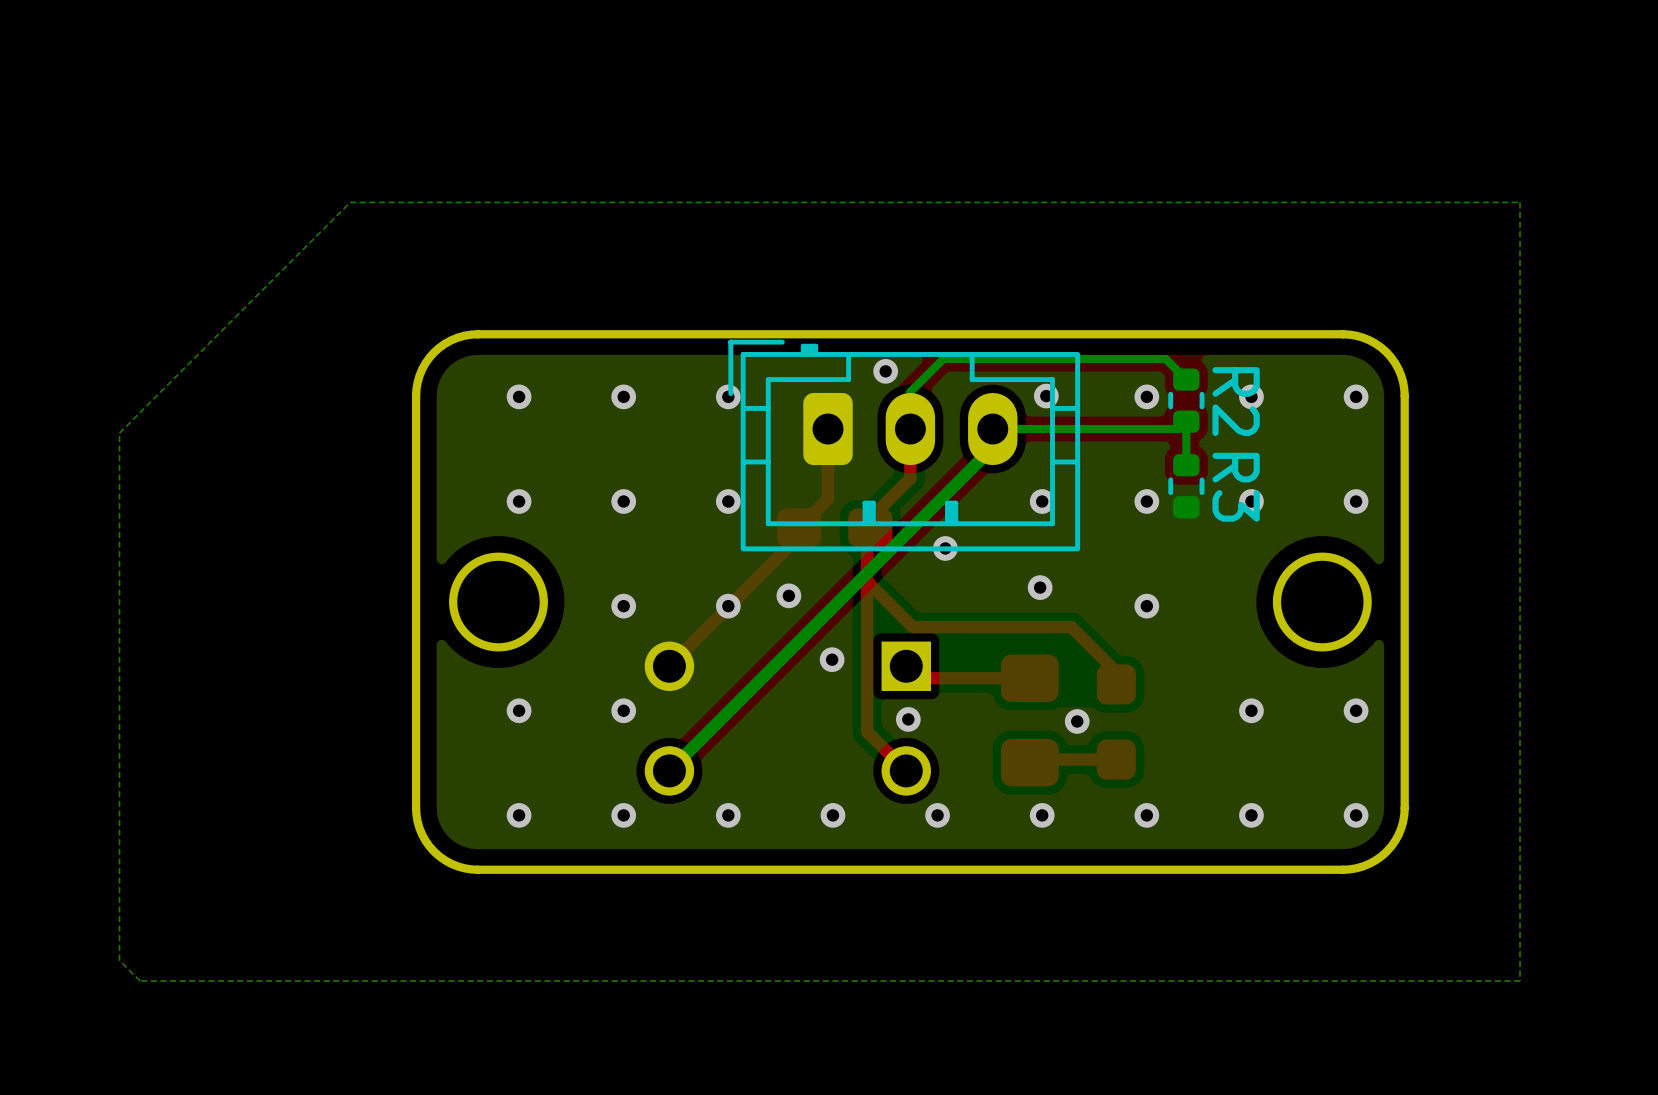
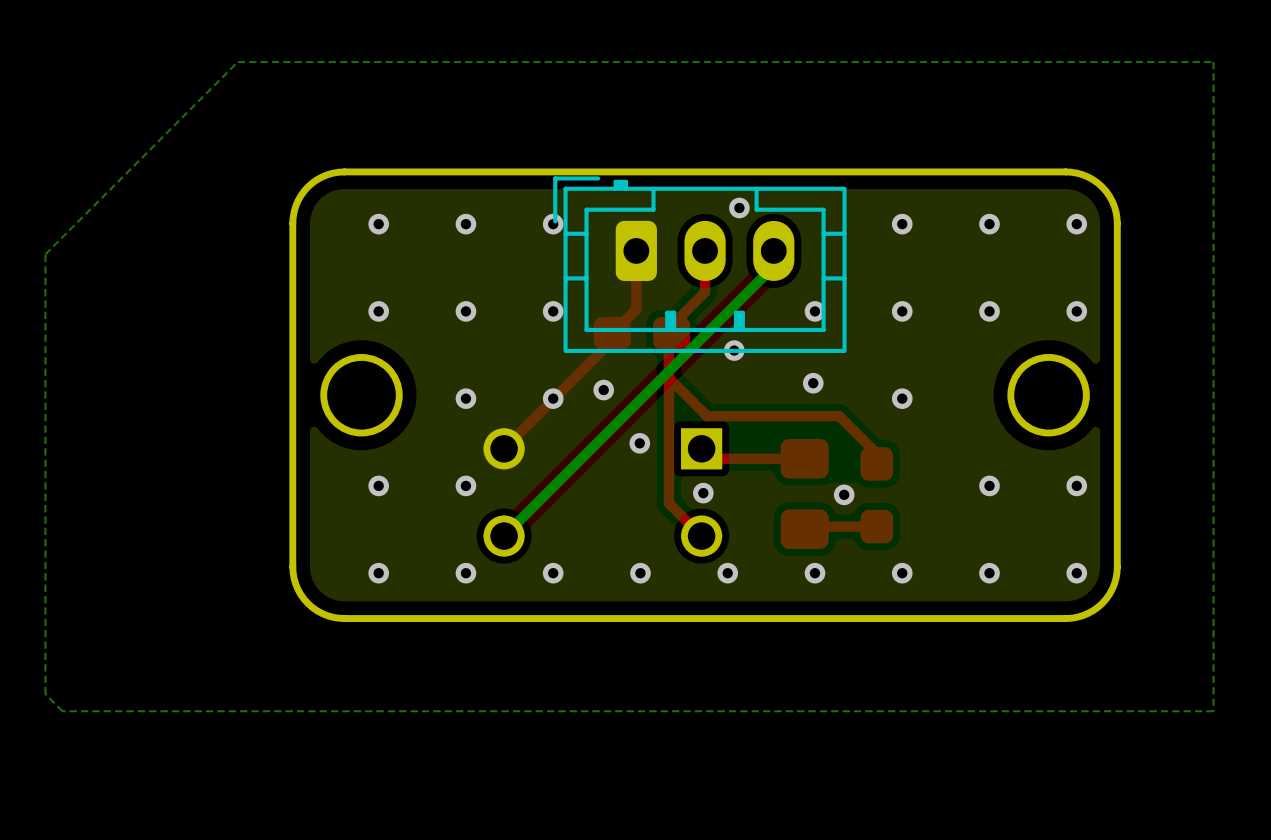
via: (885, 371) -> none
via: none -> (739, 207)
bottom track: (1186, 379) (1165, 359) (943, 359) (910, 391) (910, 429) -> none
via: (1046, 396) -> none
R2: (1186, 400) -> none
bottom track: (1185, 421) (1178, 429) (992, 429) -> none
bottom track: (1186, 421) (1186, 465) -> none
R3: (1186, 486) -> none

